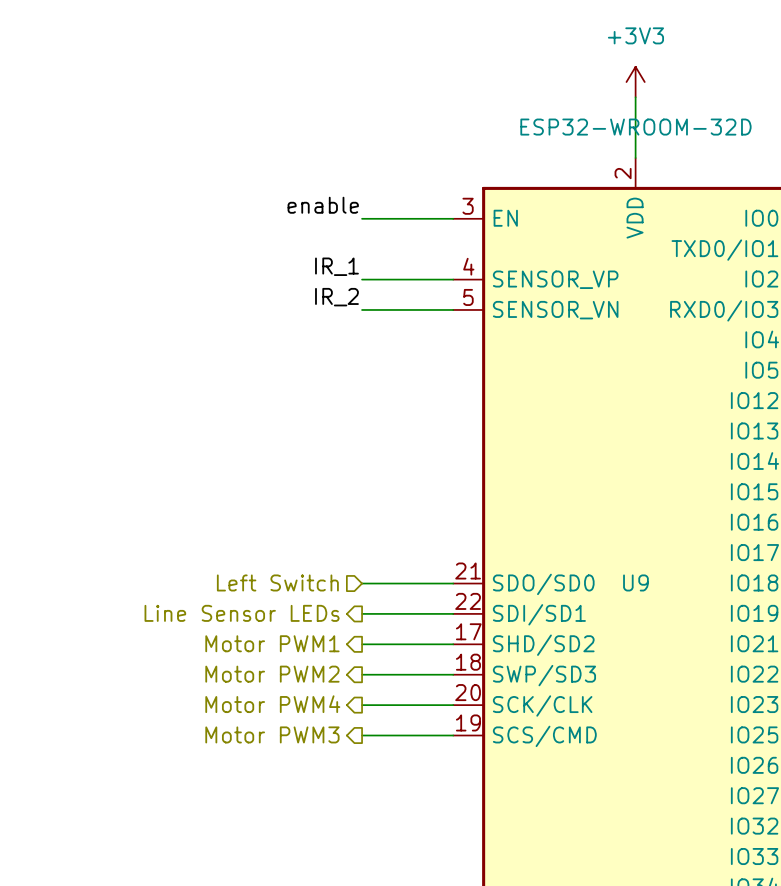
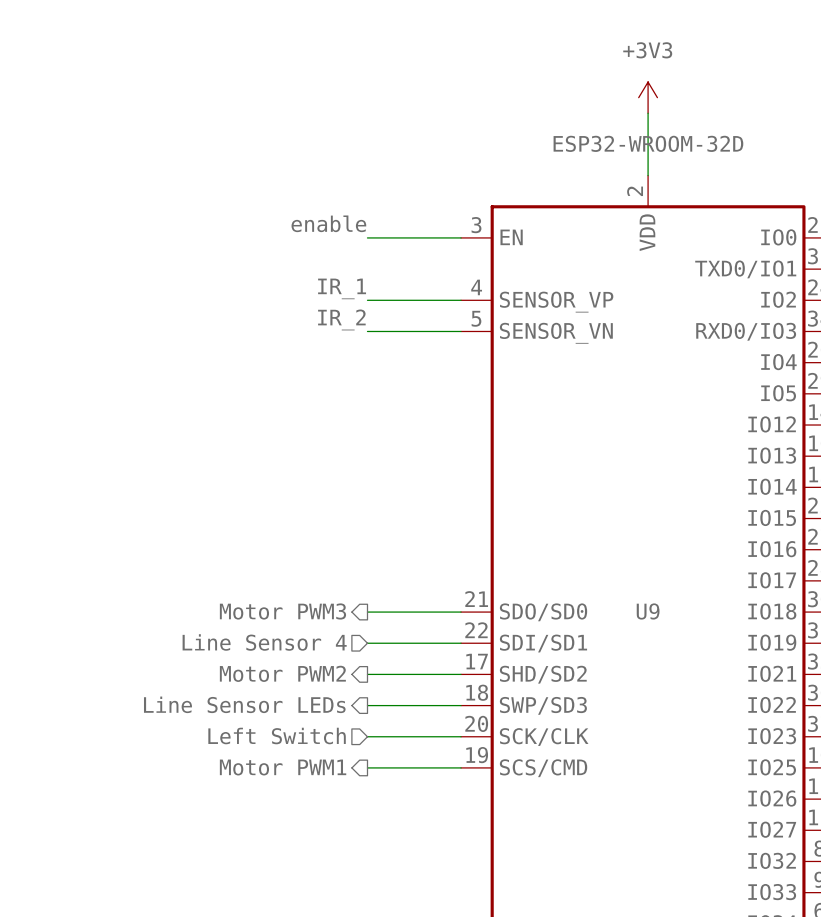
hierarchical label shape: input (277, 582) -> output (282, 611)
hierarchical label: Left Switch (277, 582) -> Motor PWM3 (282, 611)
hierarchical label shape: output (242, 613) -> input (264, 642)
hierarchical label: Line Sensor LEDs (242, 613) -> Line Sensor 4 (264, 642)
hierarchical label: Motor PWM1 (272, 643) -> Motor PWM2 (282, 673)
hierarchical label: Motor PWM2 (272, 674) -> Line Sensor LEDs (244, 704)
hierarchical label shape: output (272, 704) -> input (277, 736)
hierarchical label: Motor PWM4 (272, 704) -> Left Switch (277, 736)
hierarchical label: Motor PWM3 (272, 734) -> Motor PWM1 (283, 767)

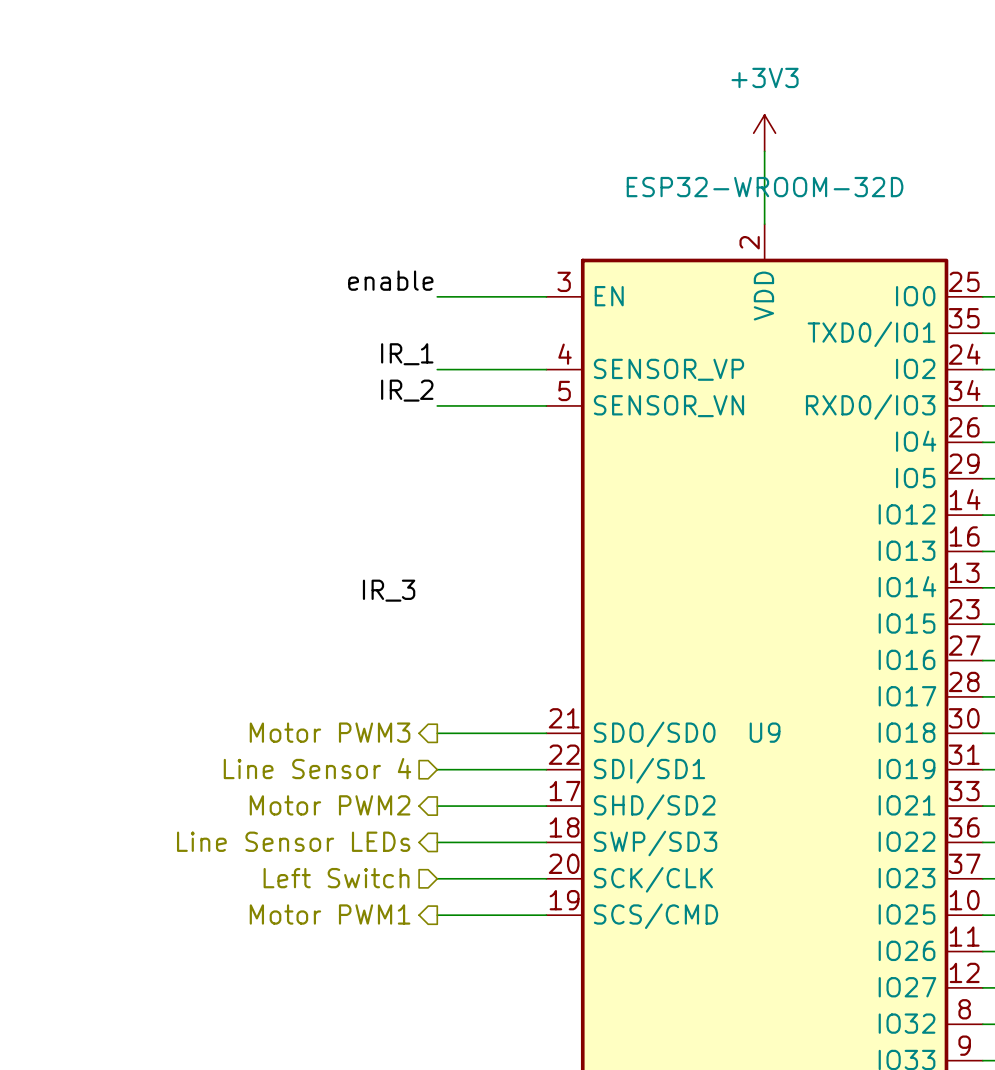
label: none -> IR_3 (389, 590)

